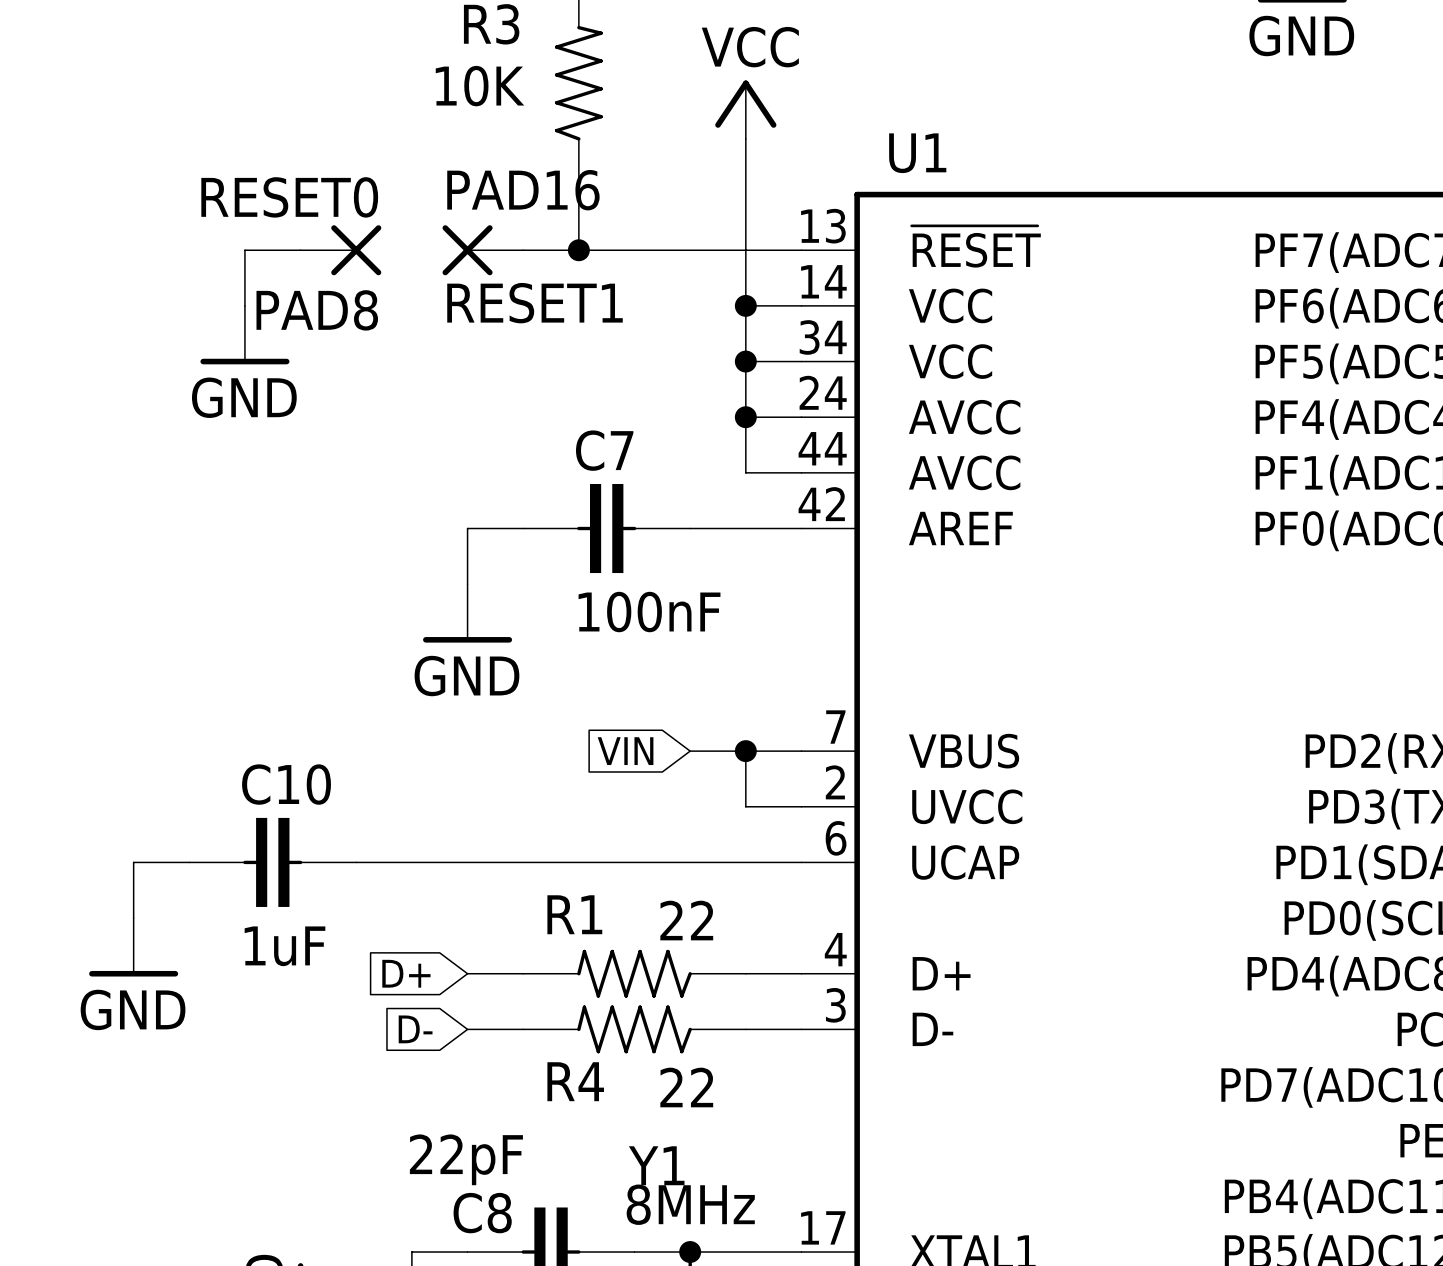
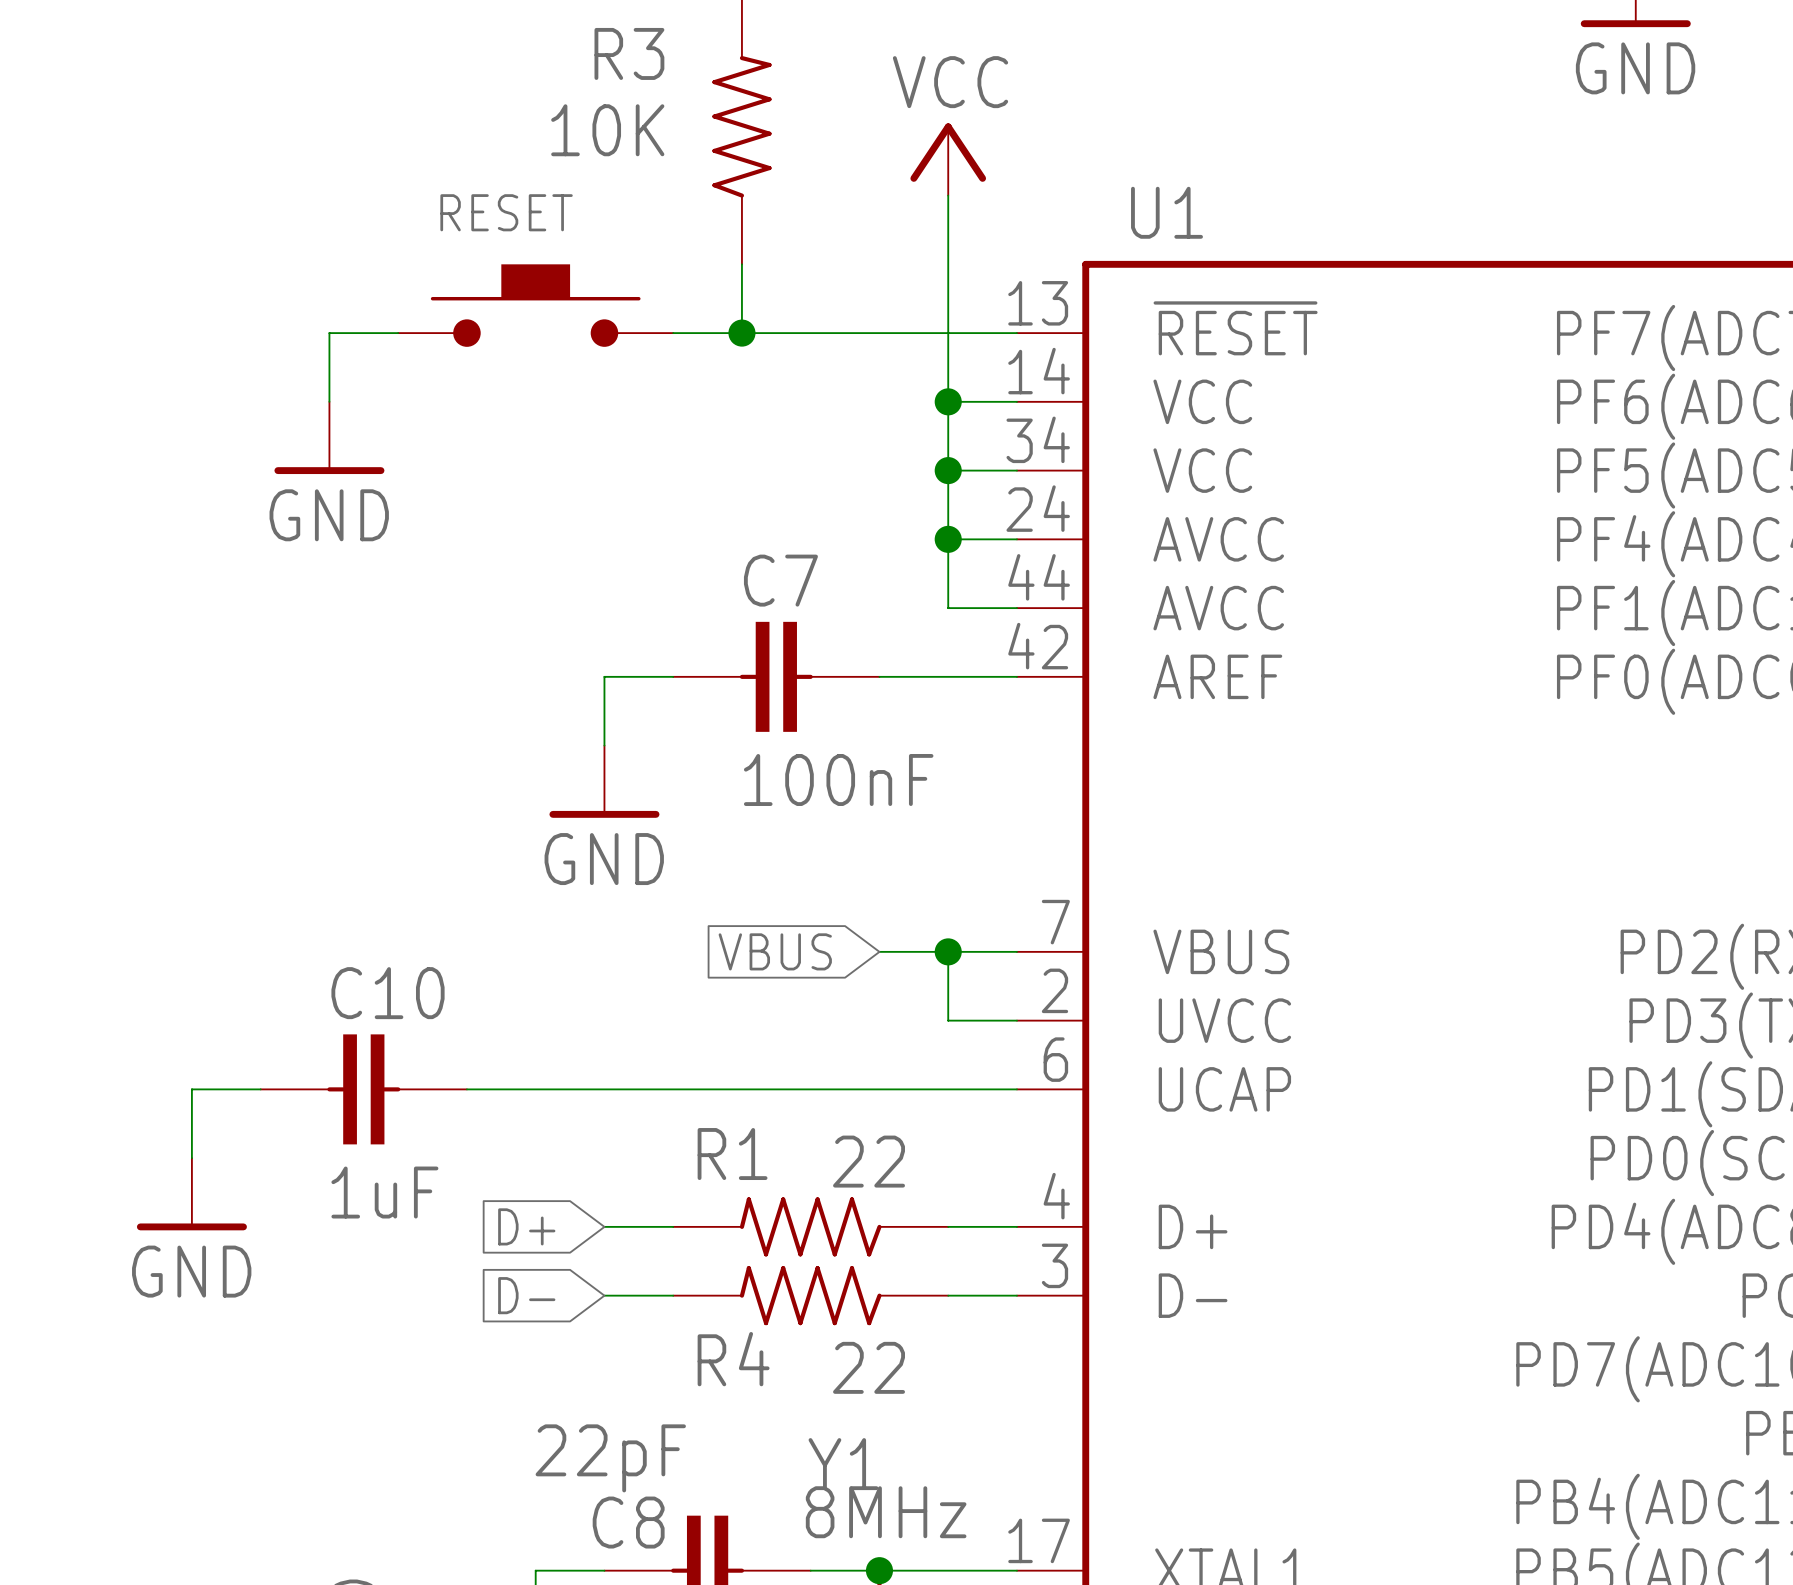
RESET: none -> (535, 305)
PAD8: RESET0 (340, 250) -> none
PAD16: RESET1 (482, 250) -> none
global label: VIN (625, 751) -> VBUS (775, 951)

